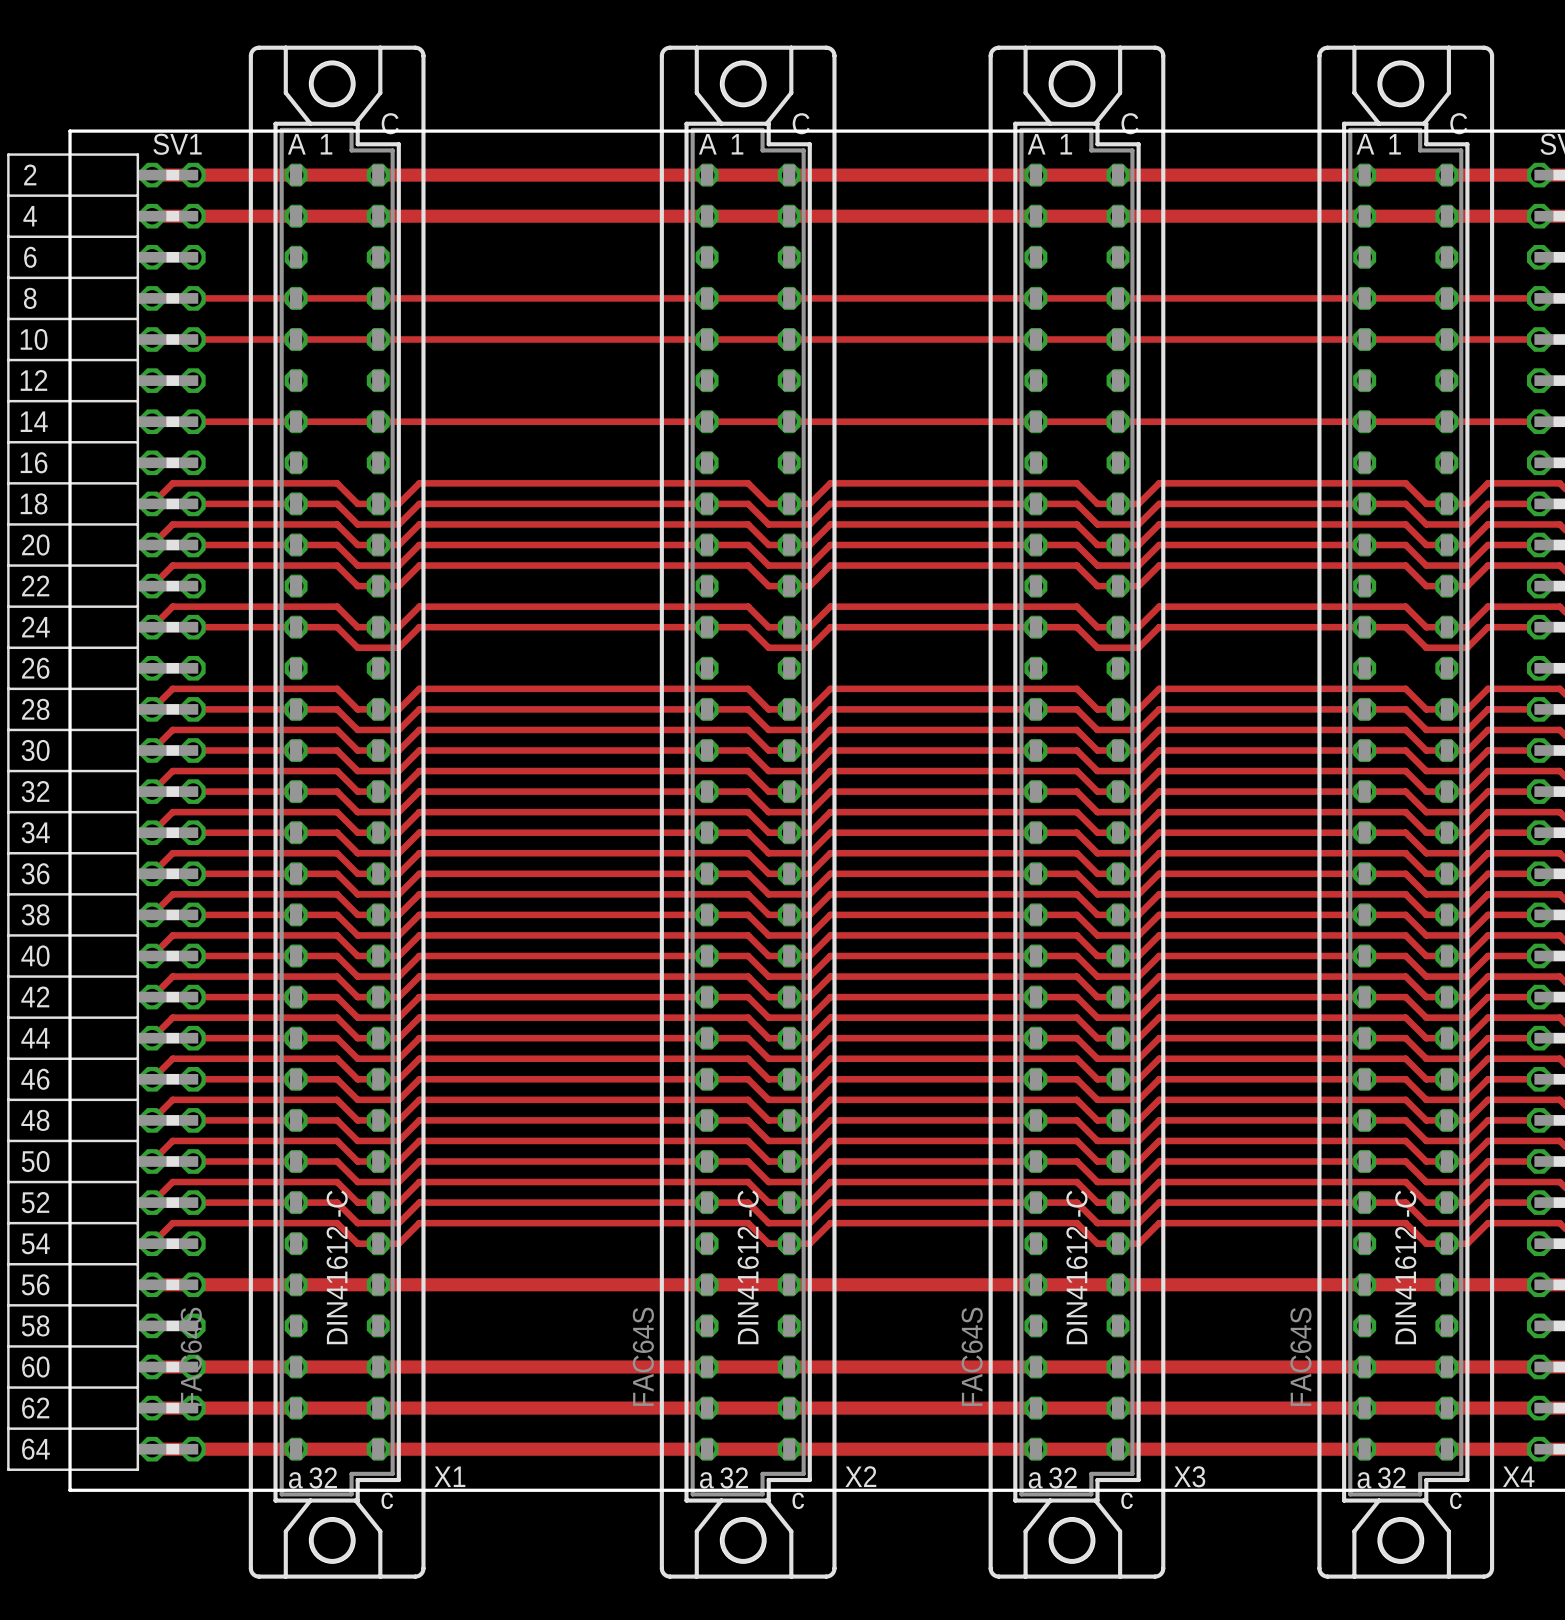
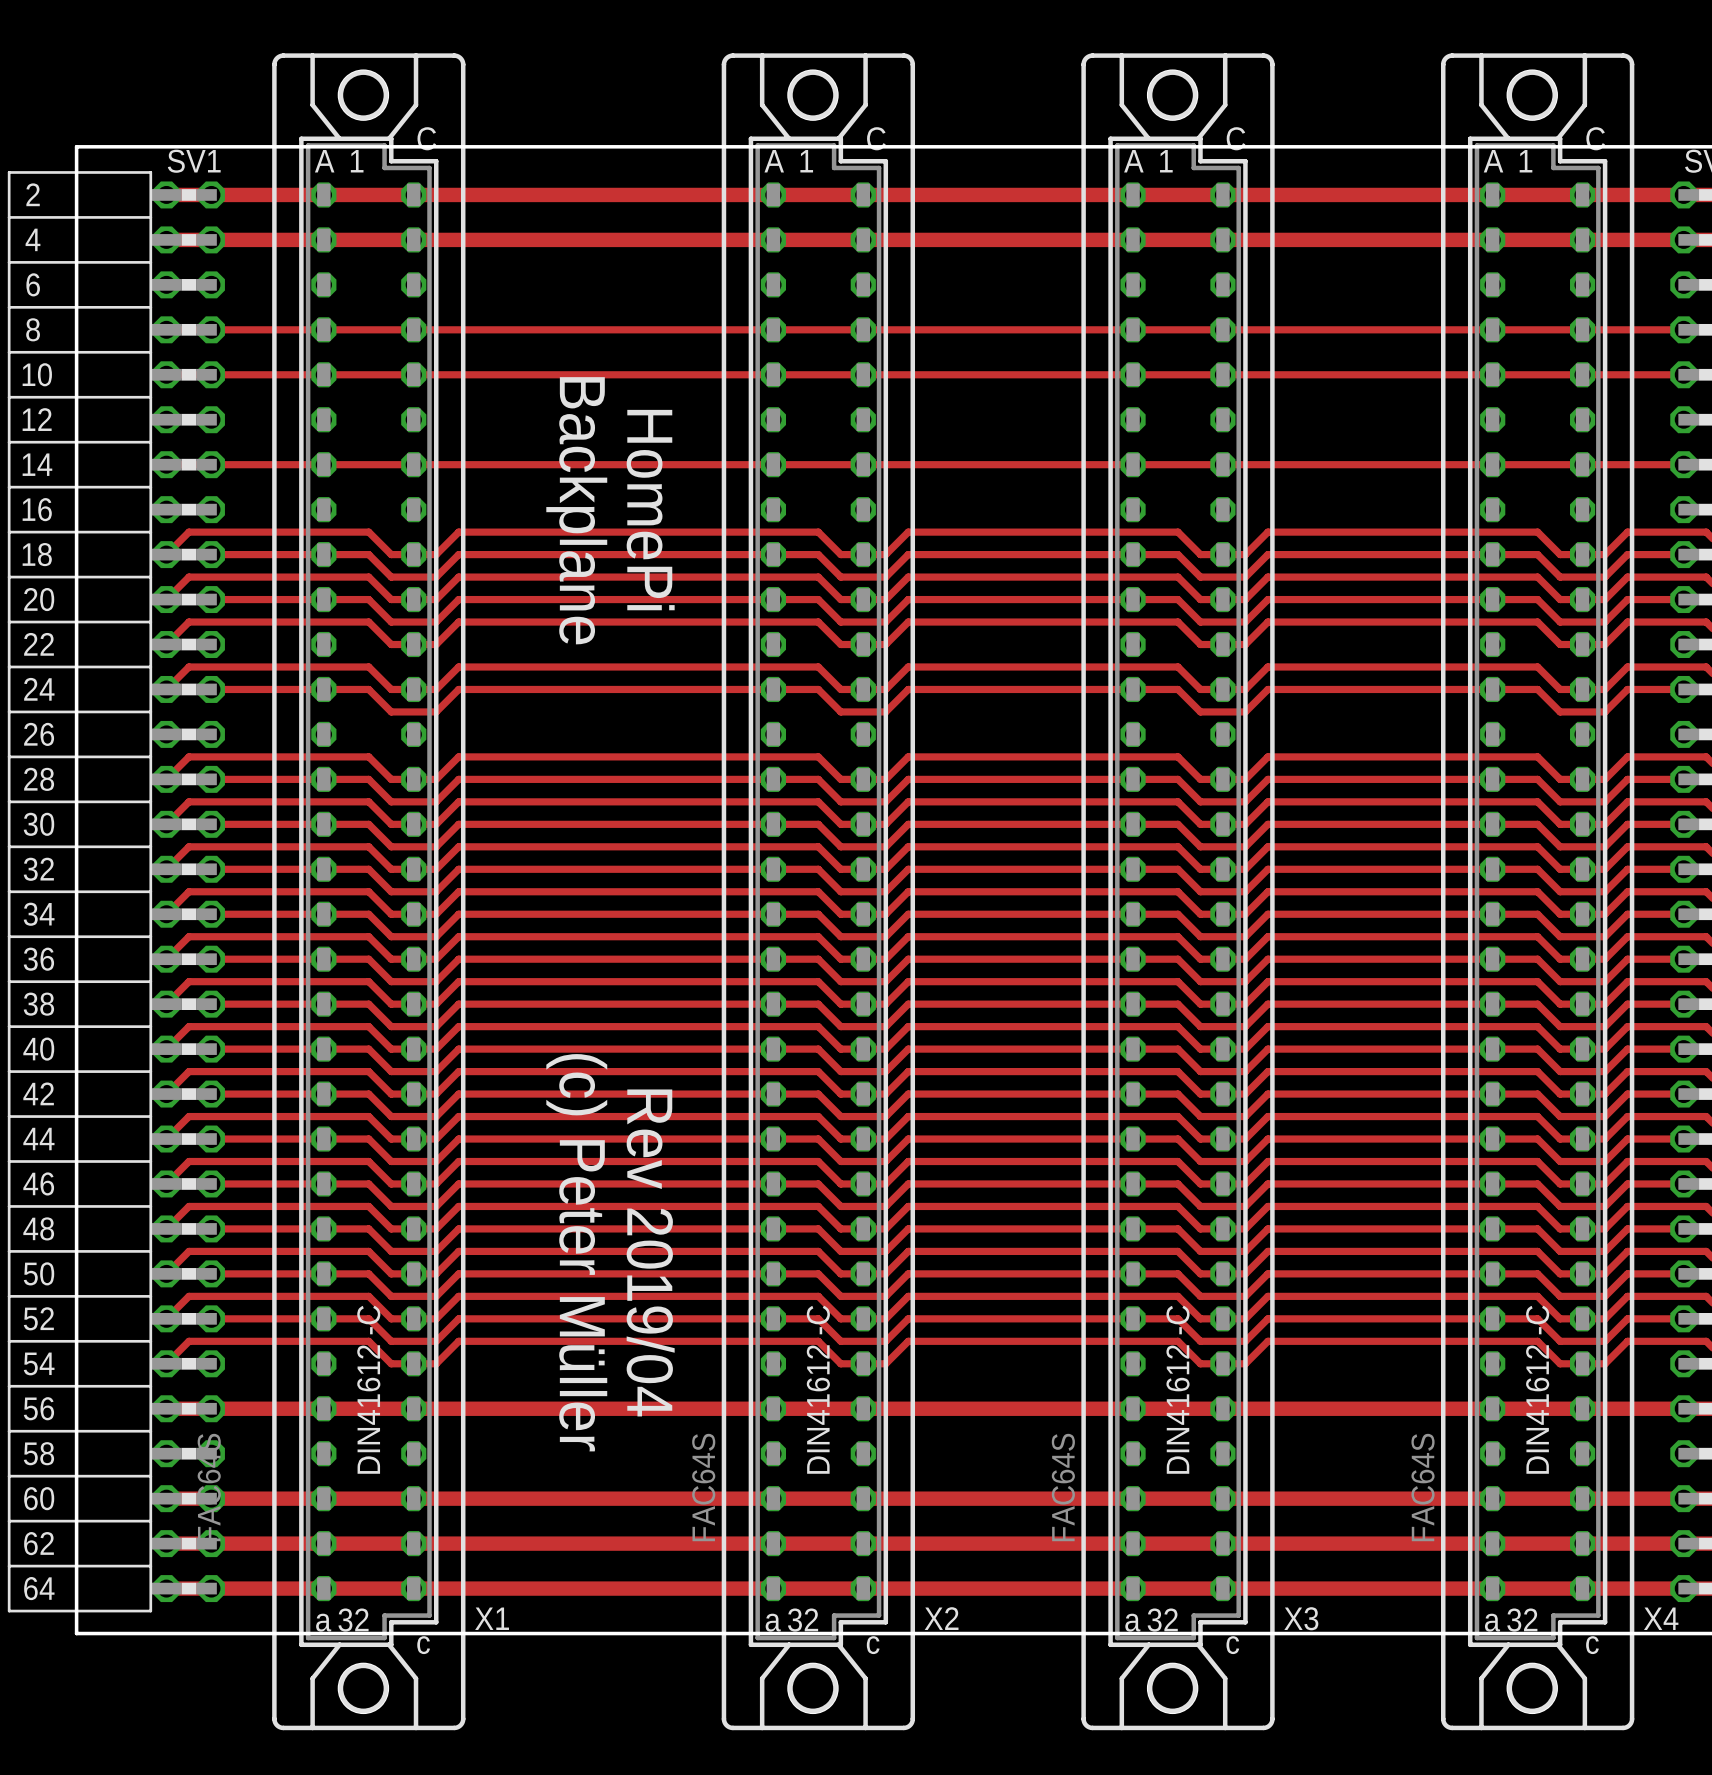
text: none -> Backplane (576, 510)
text: none -> HomePi (650, 510)
text: none -> (c) Peter Müller (576, 1252)
text: none -> Rev 2019/04 (650, 1252)

